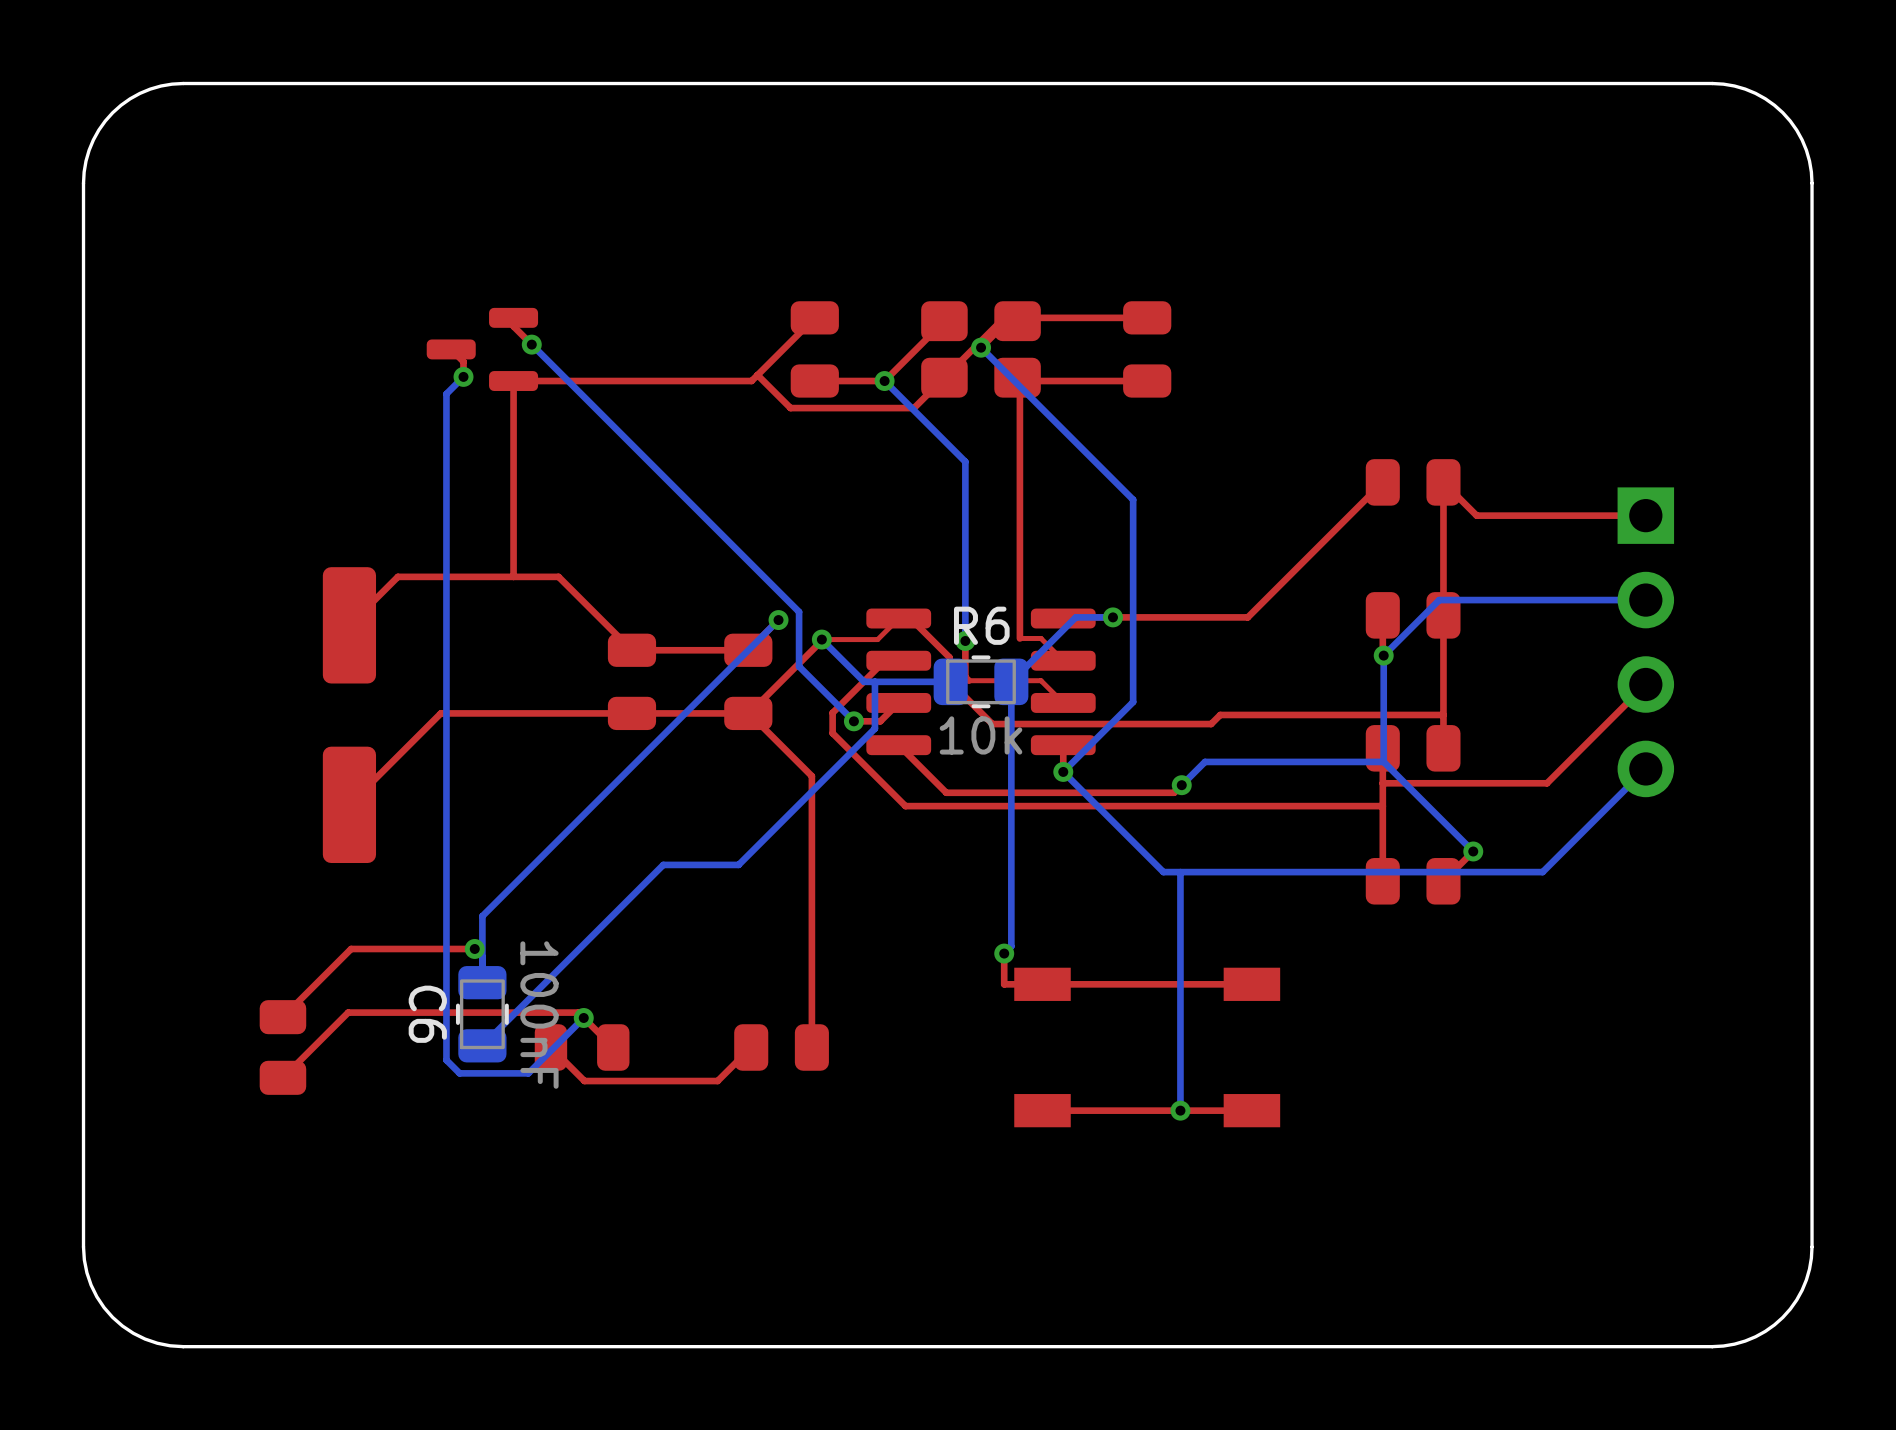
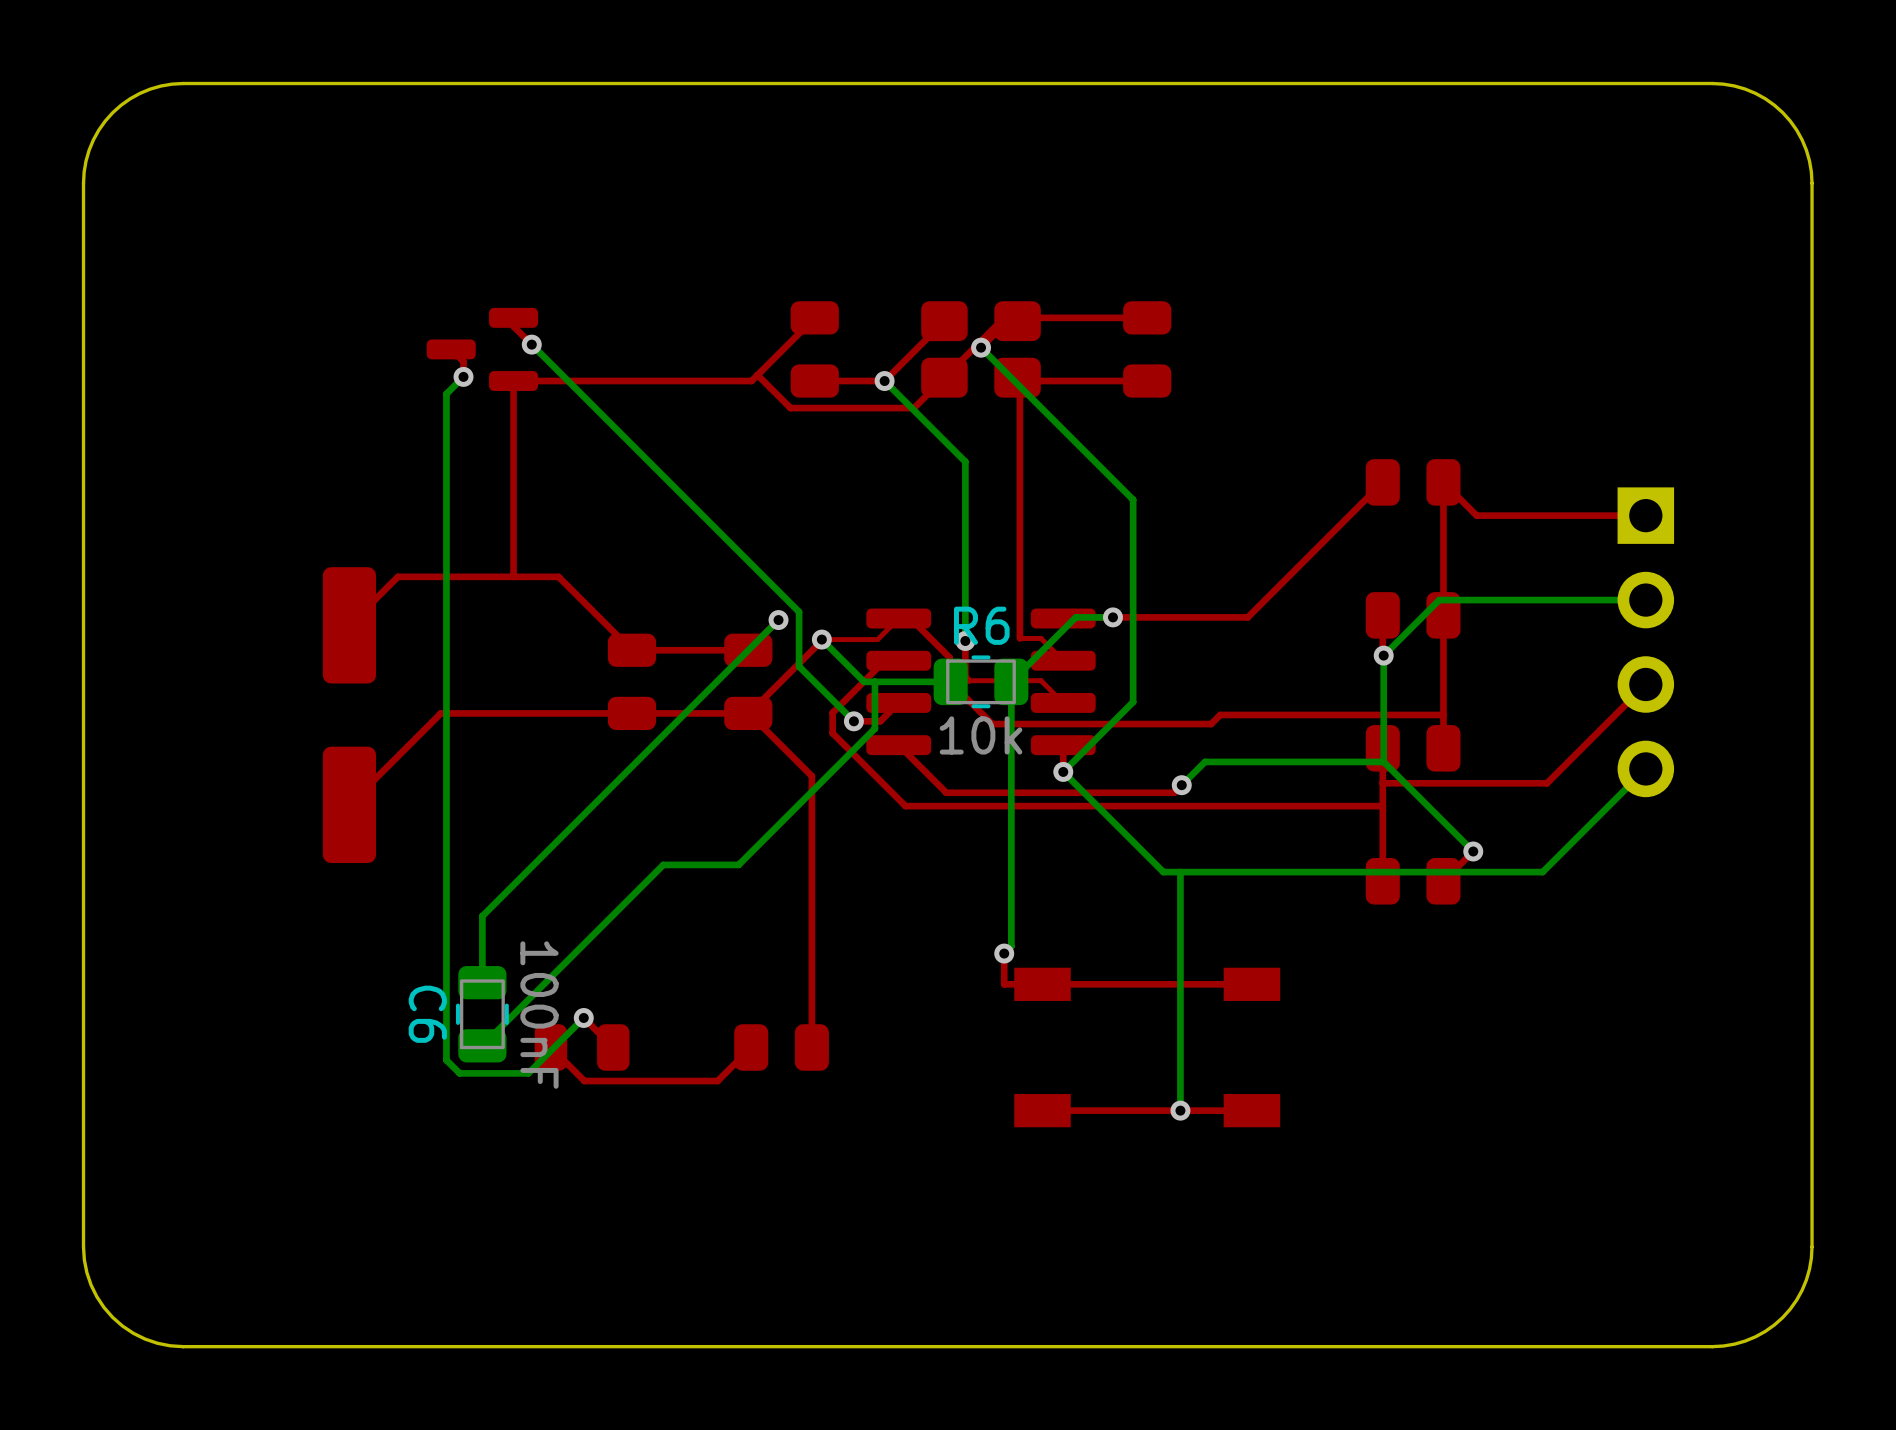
top track: (474, 948) (351, 948) (282, 1017) -> none
via: (474, 948) -> none
top track: (583, 1017) (578, 1012) (348, 1012) (282, 1077) -> none
part: (282, 1047) -> none

